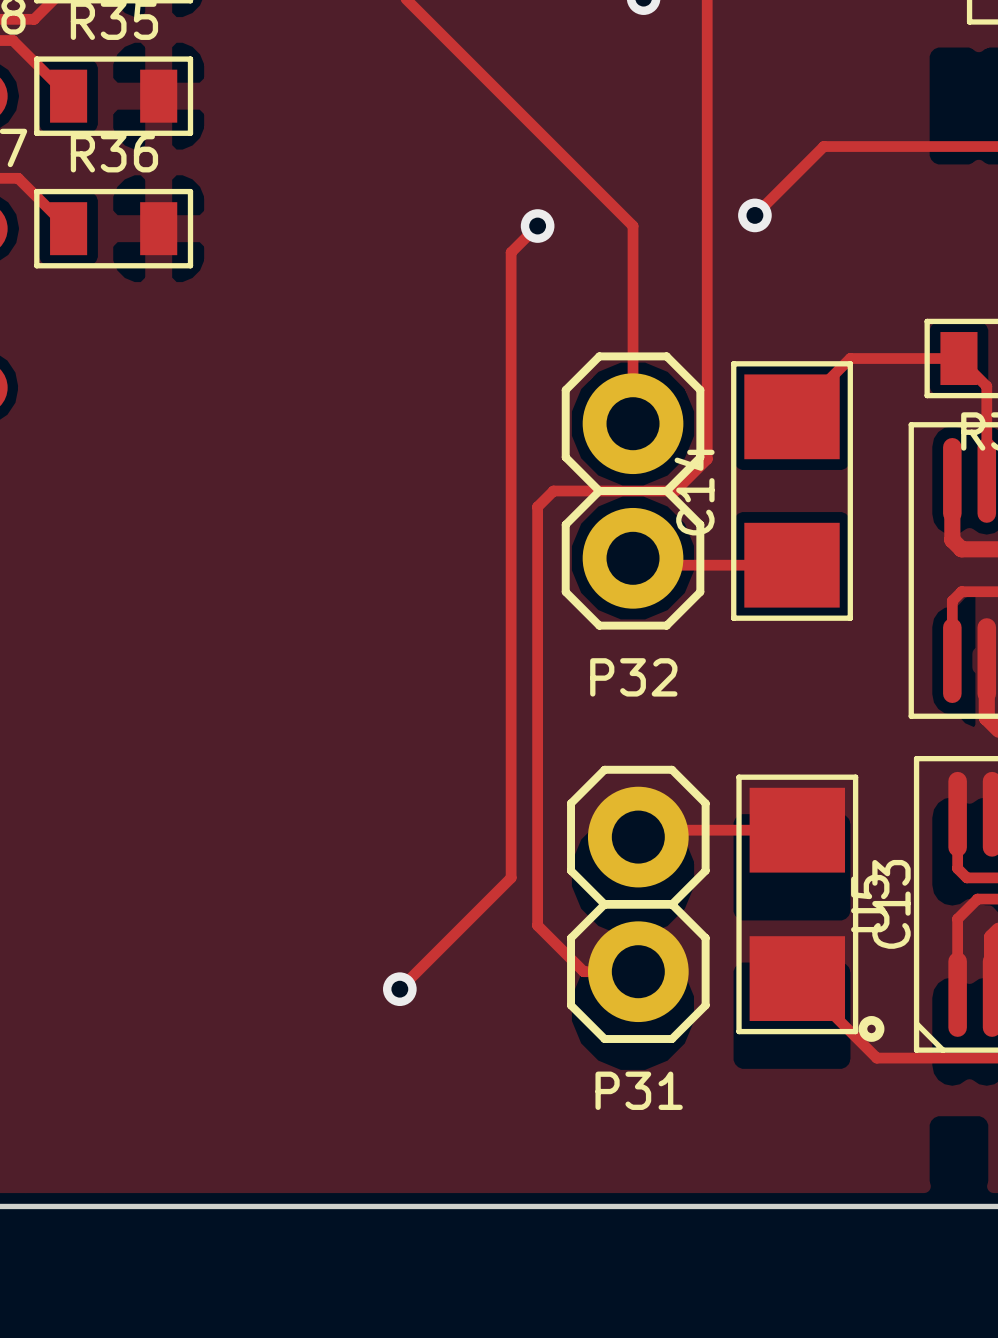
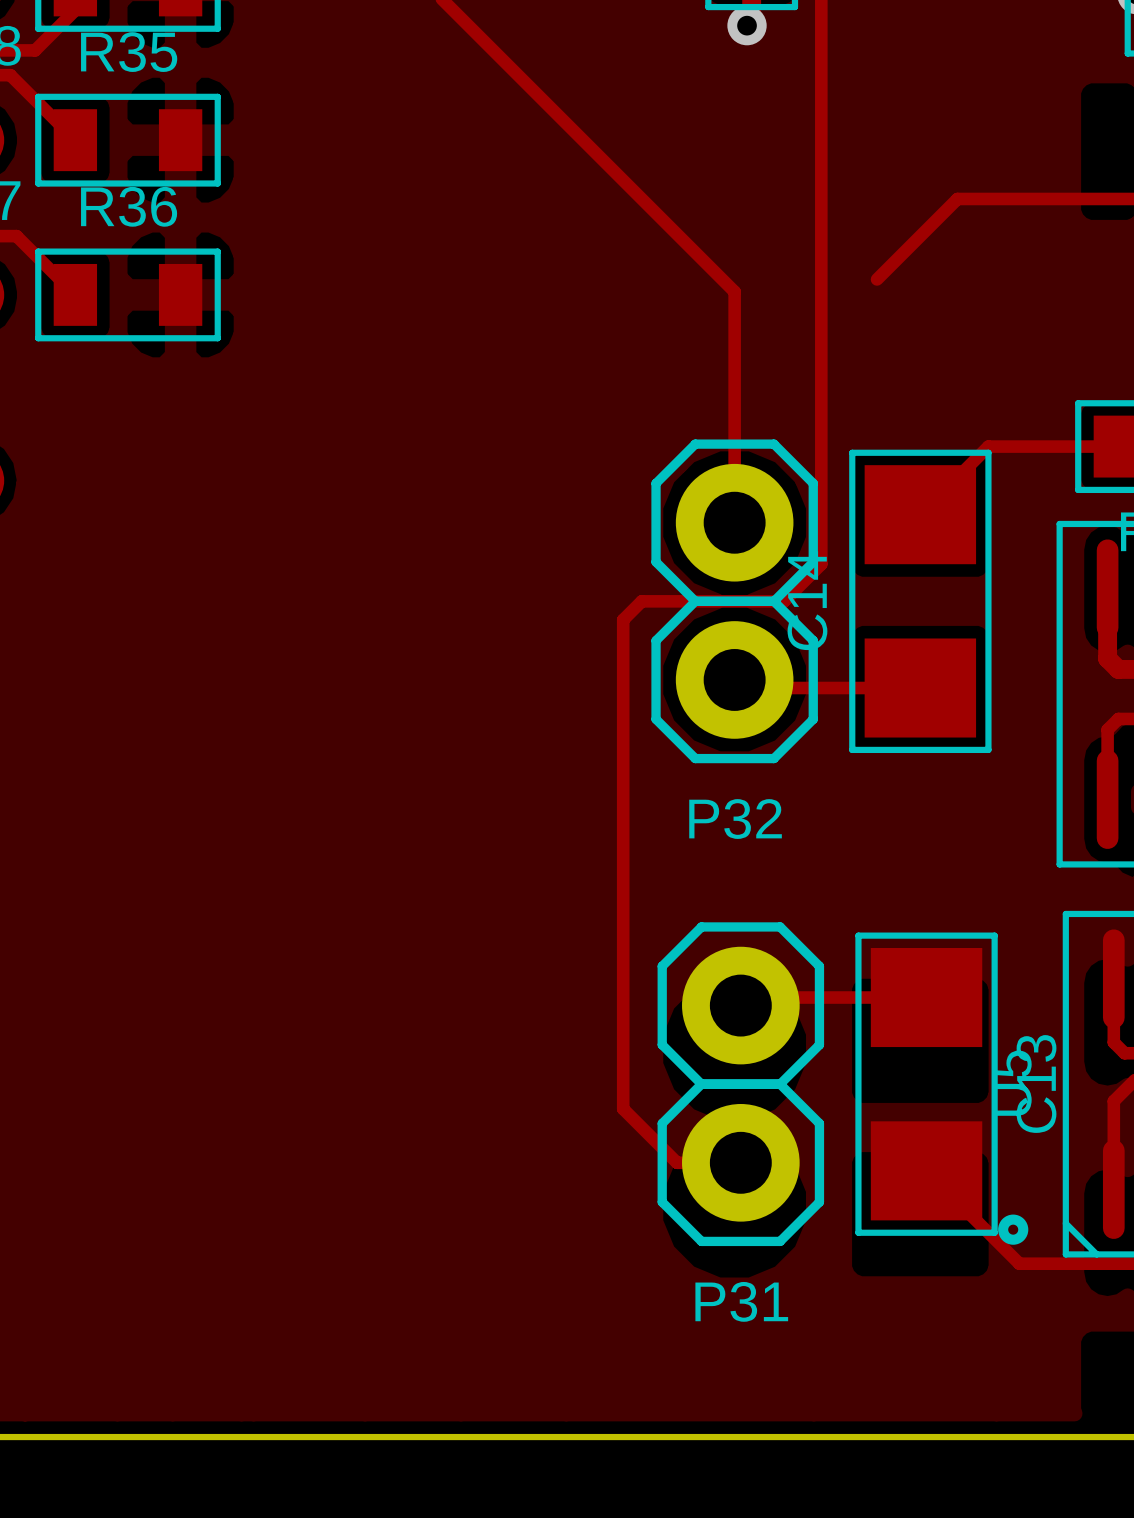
via: (754, 215) -> none
track: (537, 226) (511, 252) (511, 877) (399, 989) -> none
via: (537, 226) -> none
via: (399, 989) -> none

